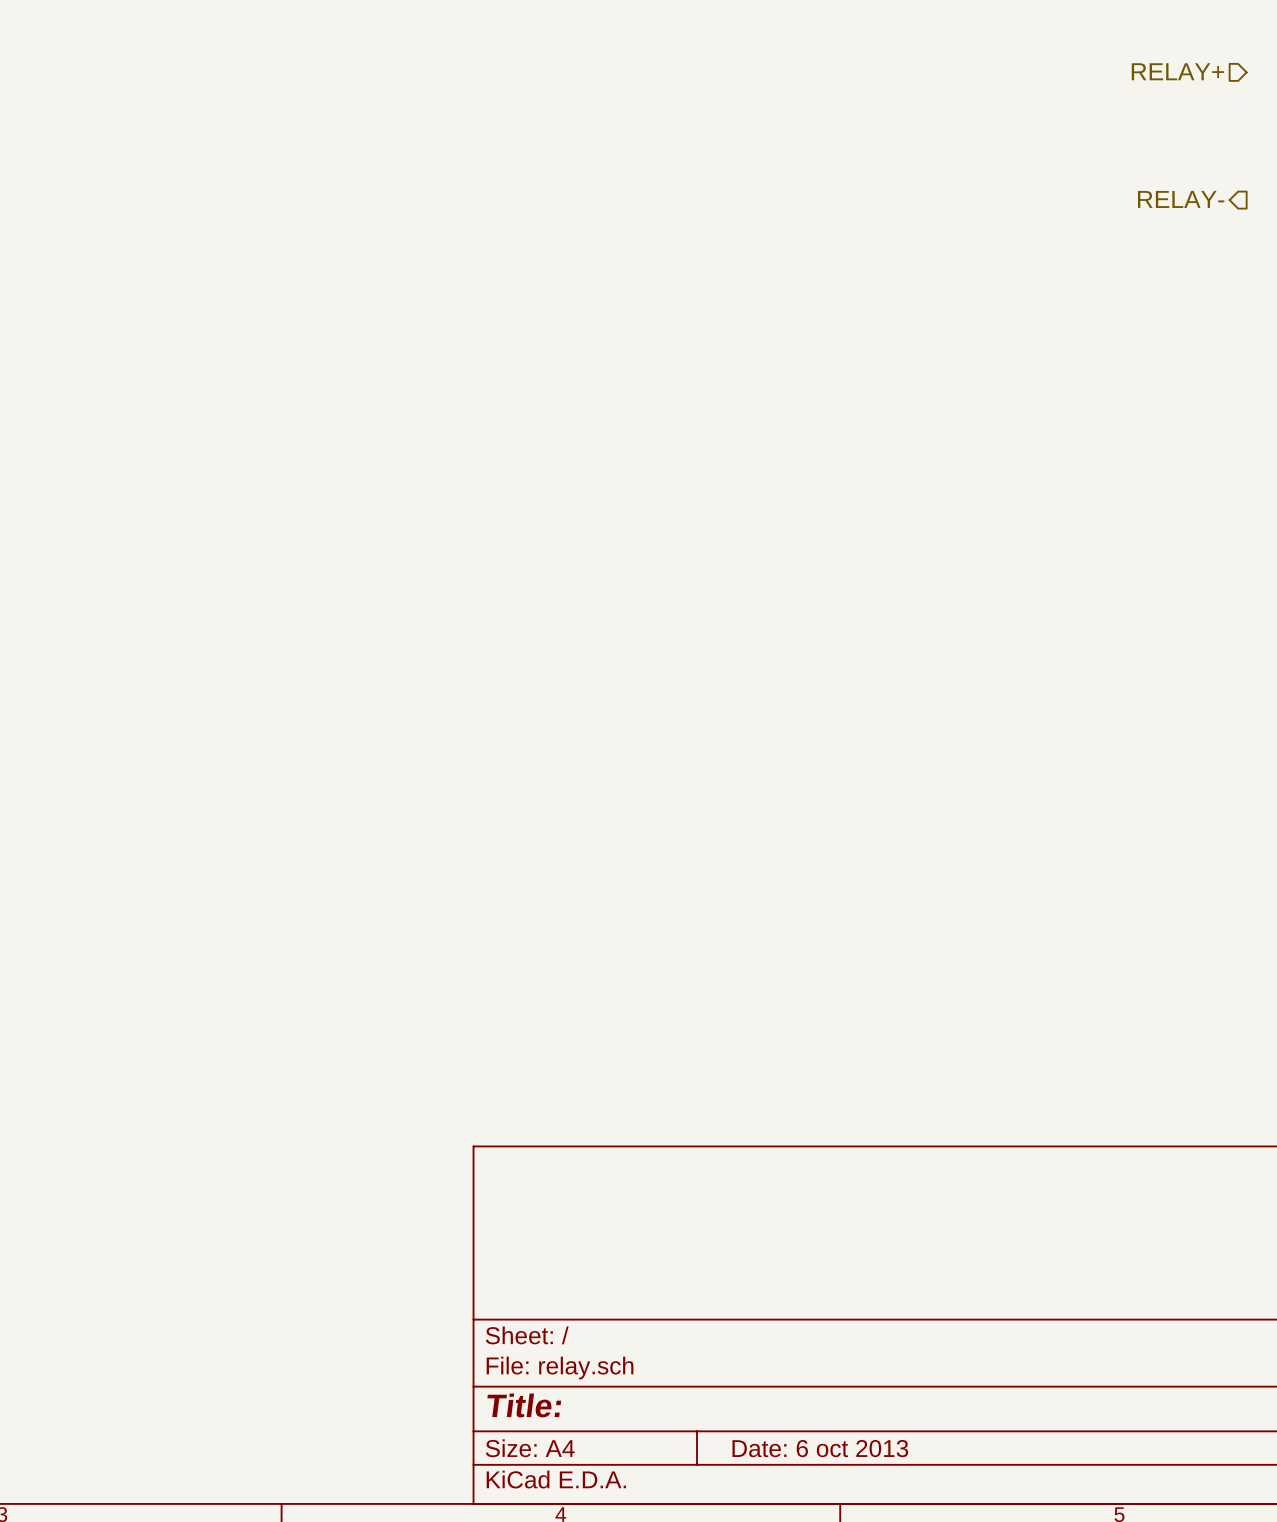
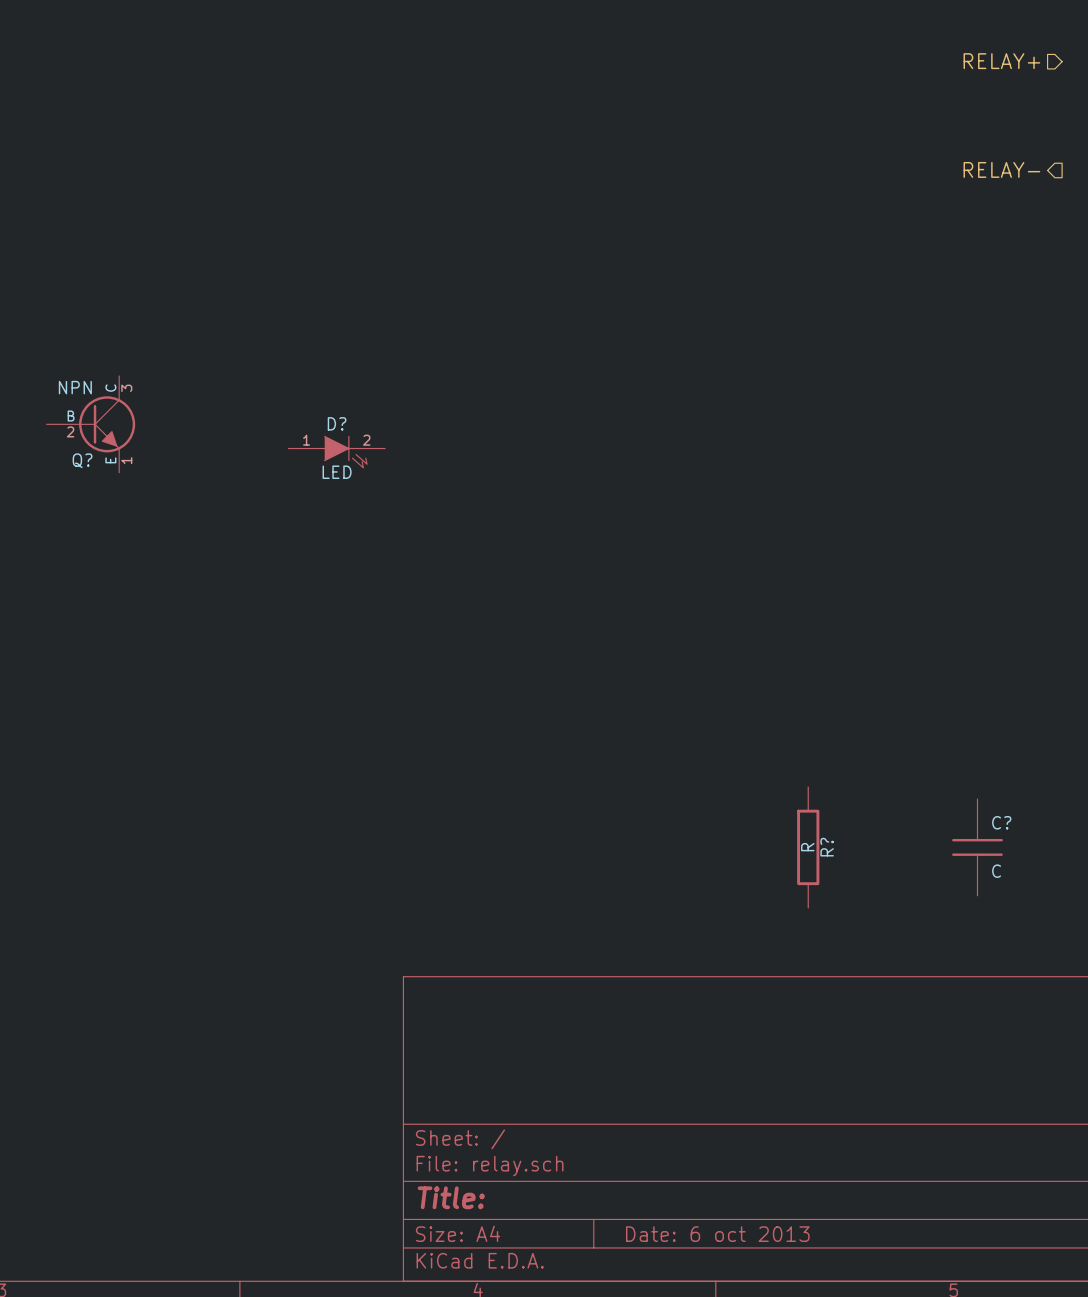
Q?: none -> NPN (90, 424)
D?: none -> LED (336, 452)
R?: none -> R (808, 847)
C?: none -> C (977, 847)

